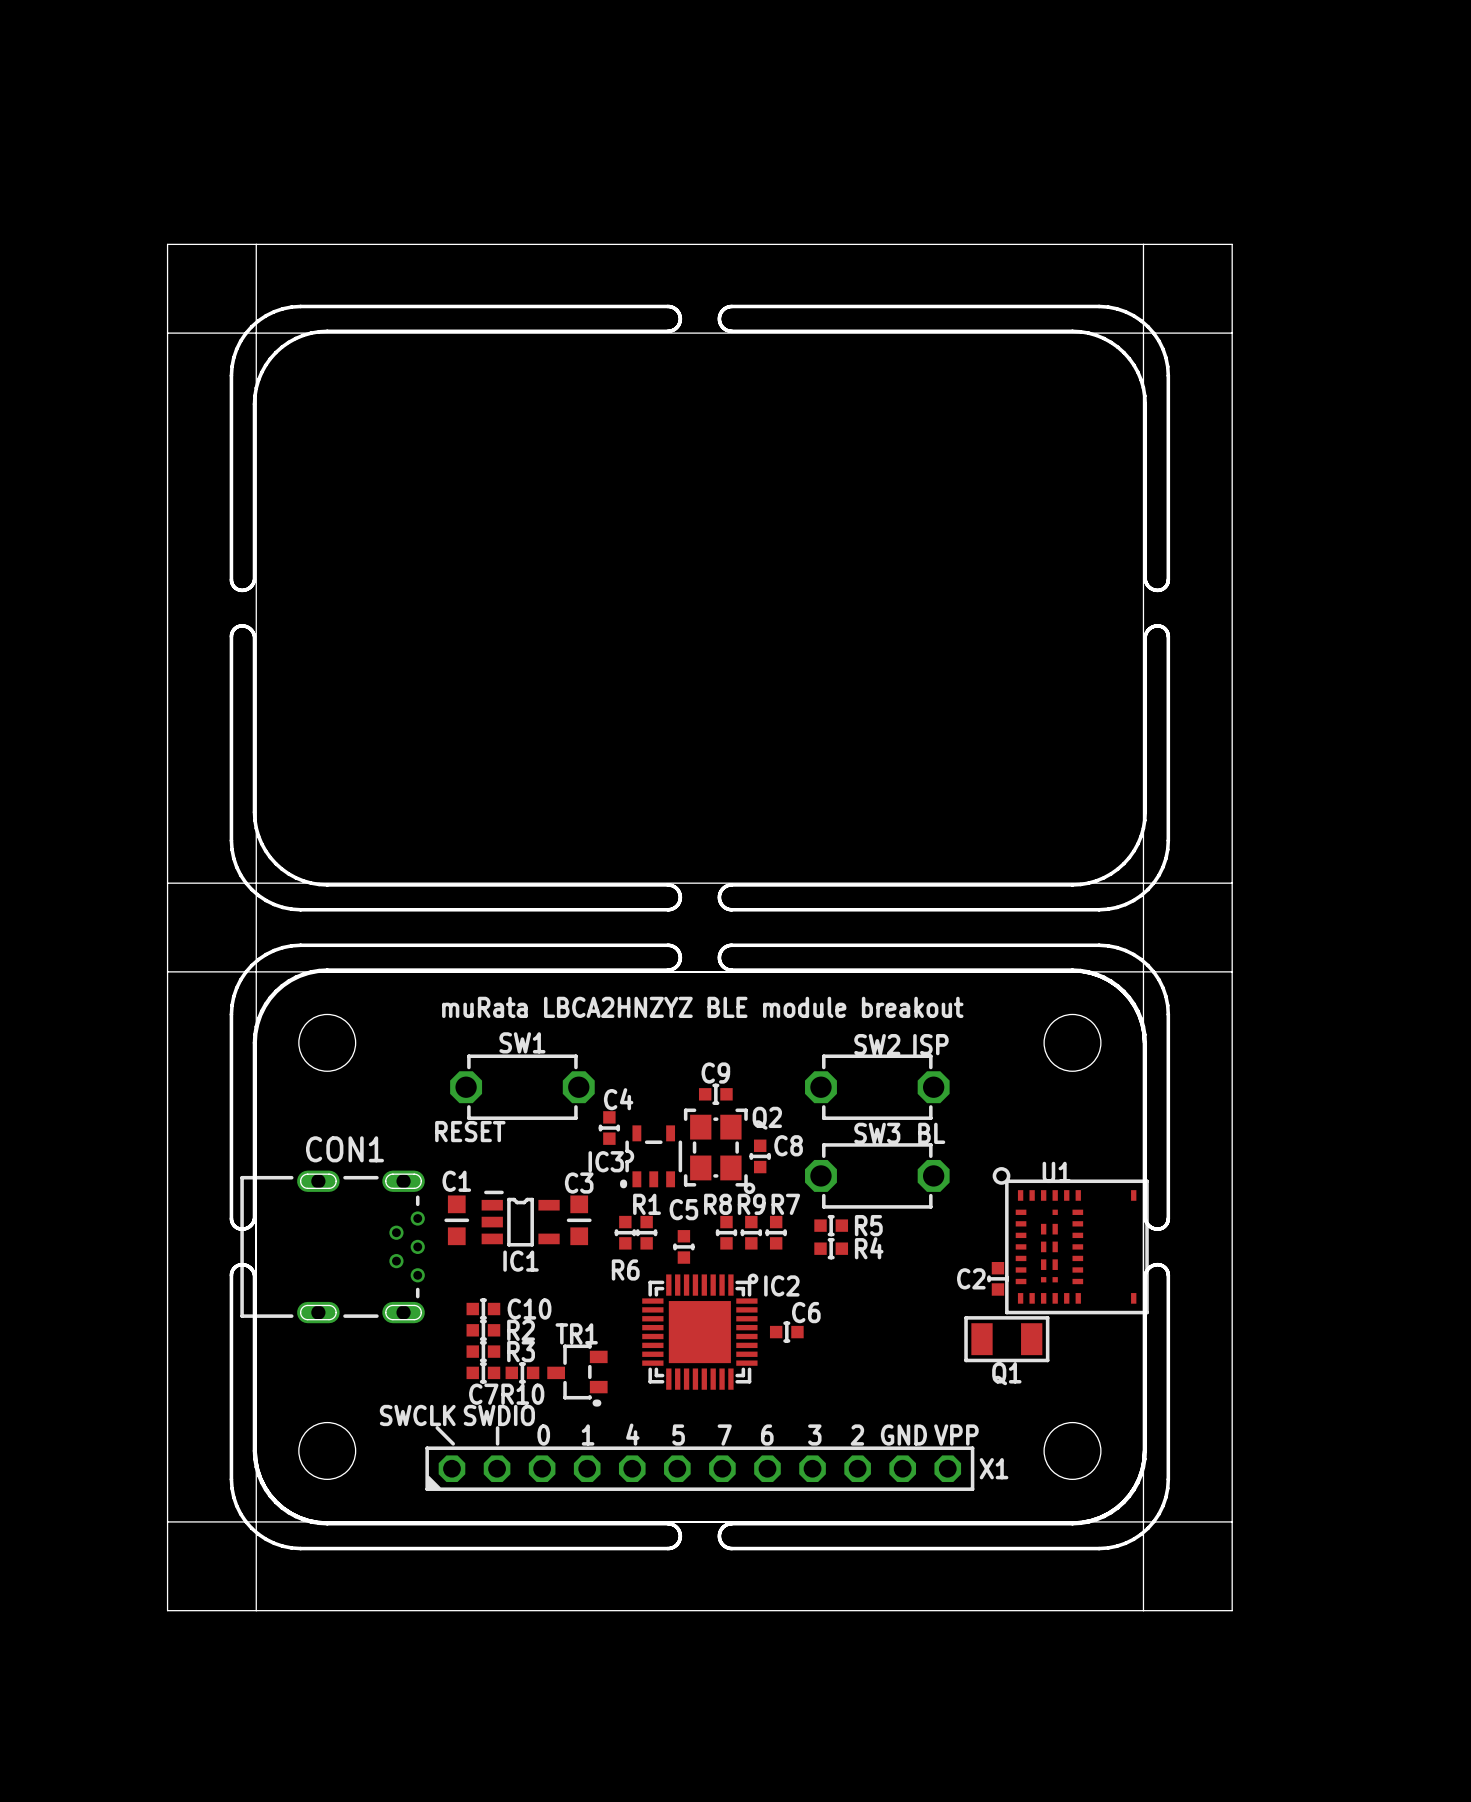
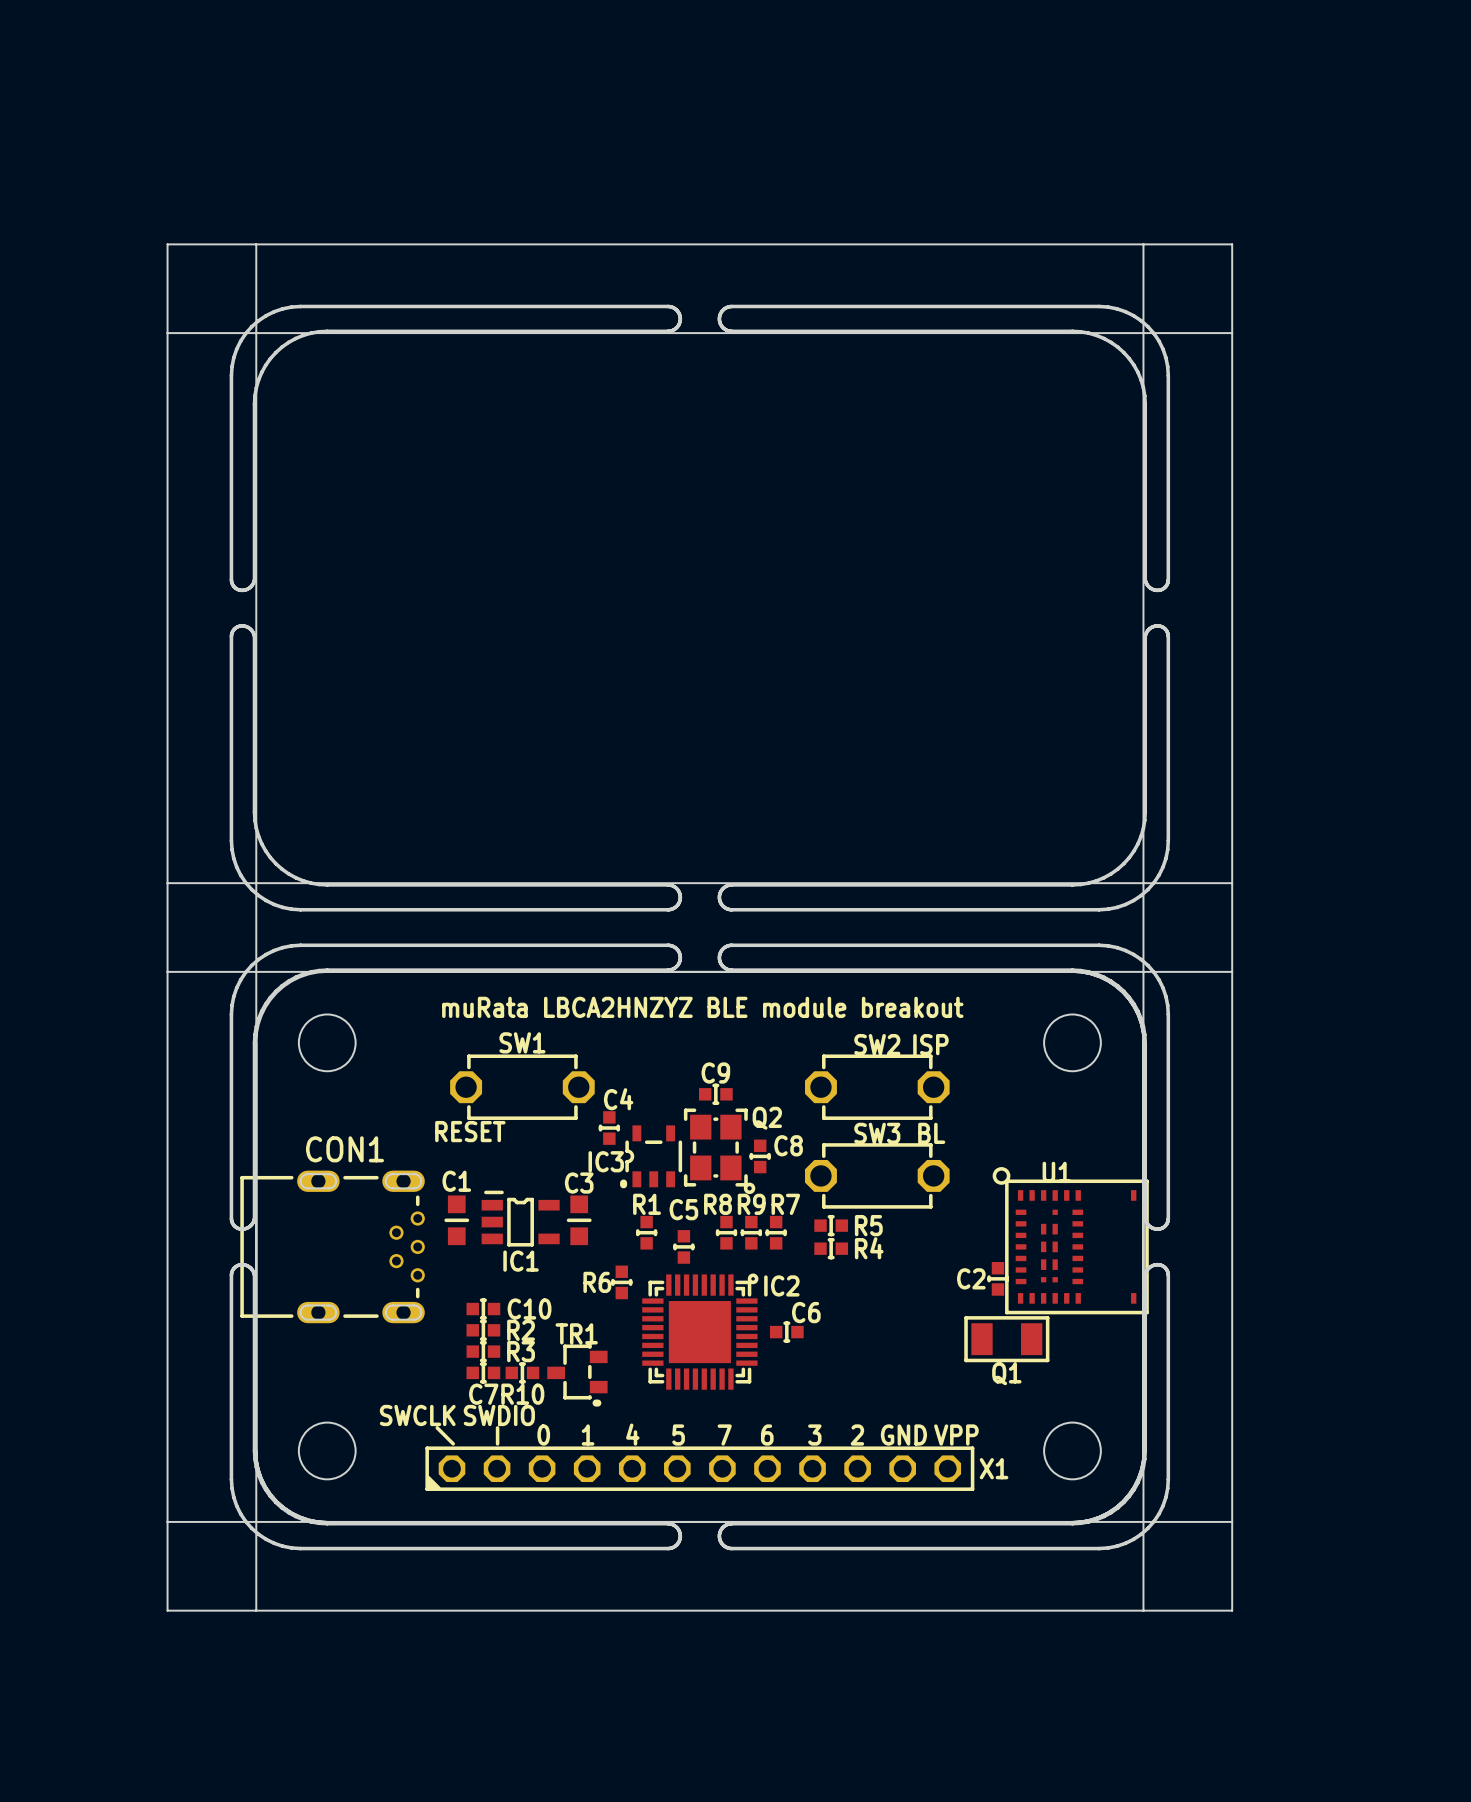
R6 position: (625, 1232) -> (621, 1282)
R6 name position: R6 (625, 1269) -> R6 (597, 1282)

